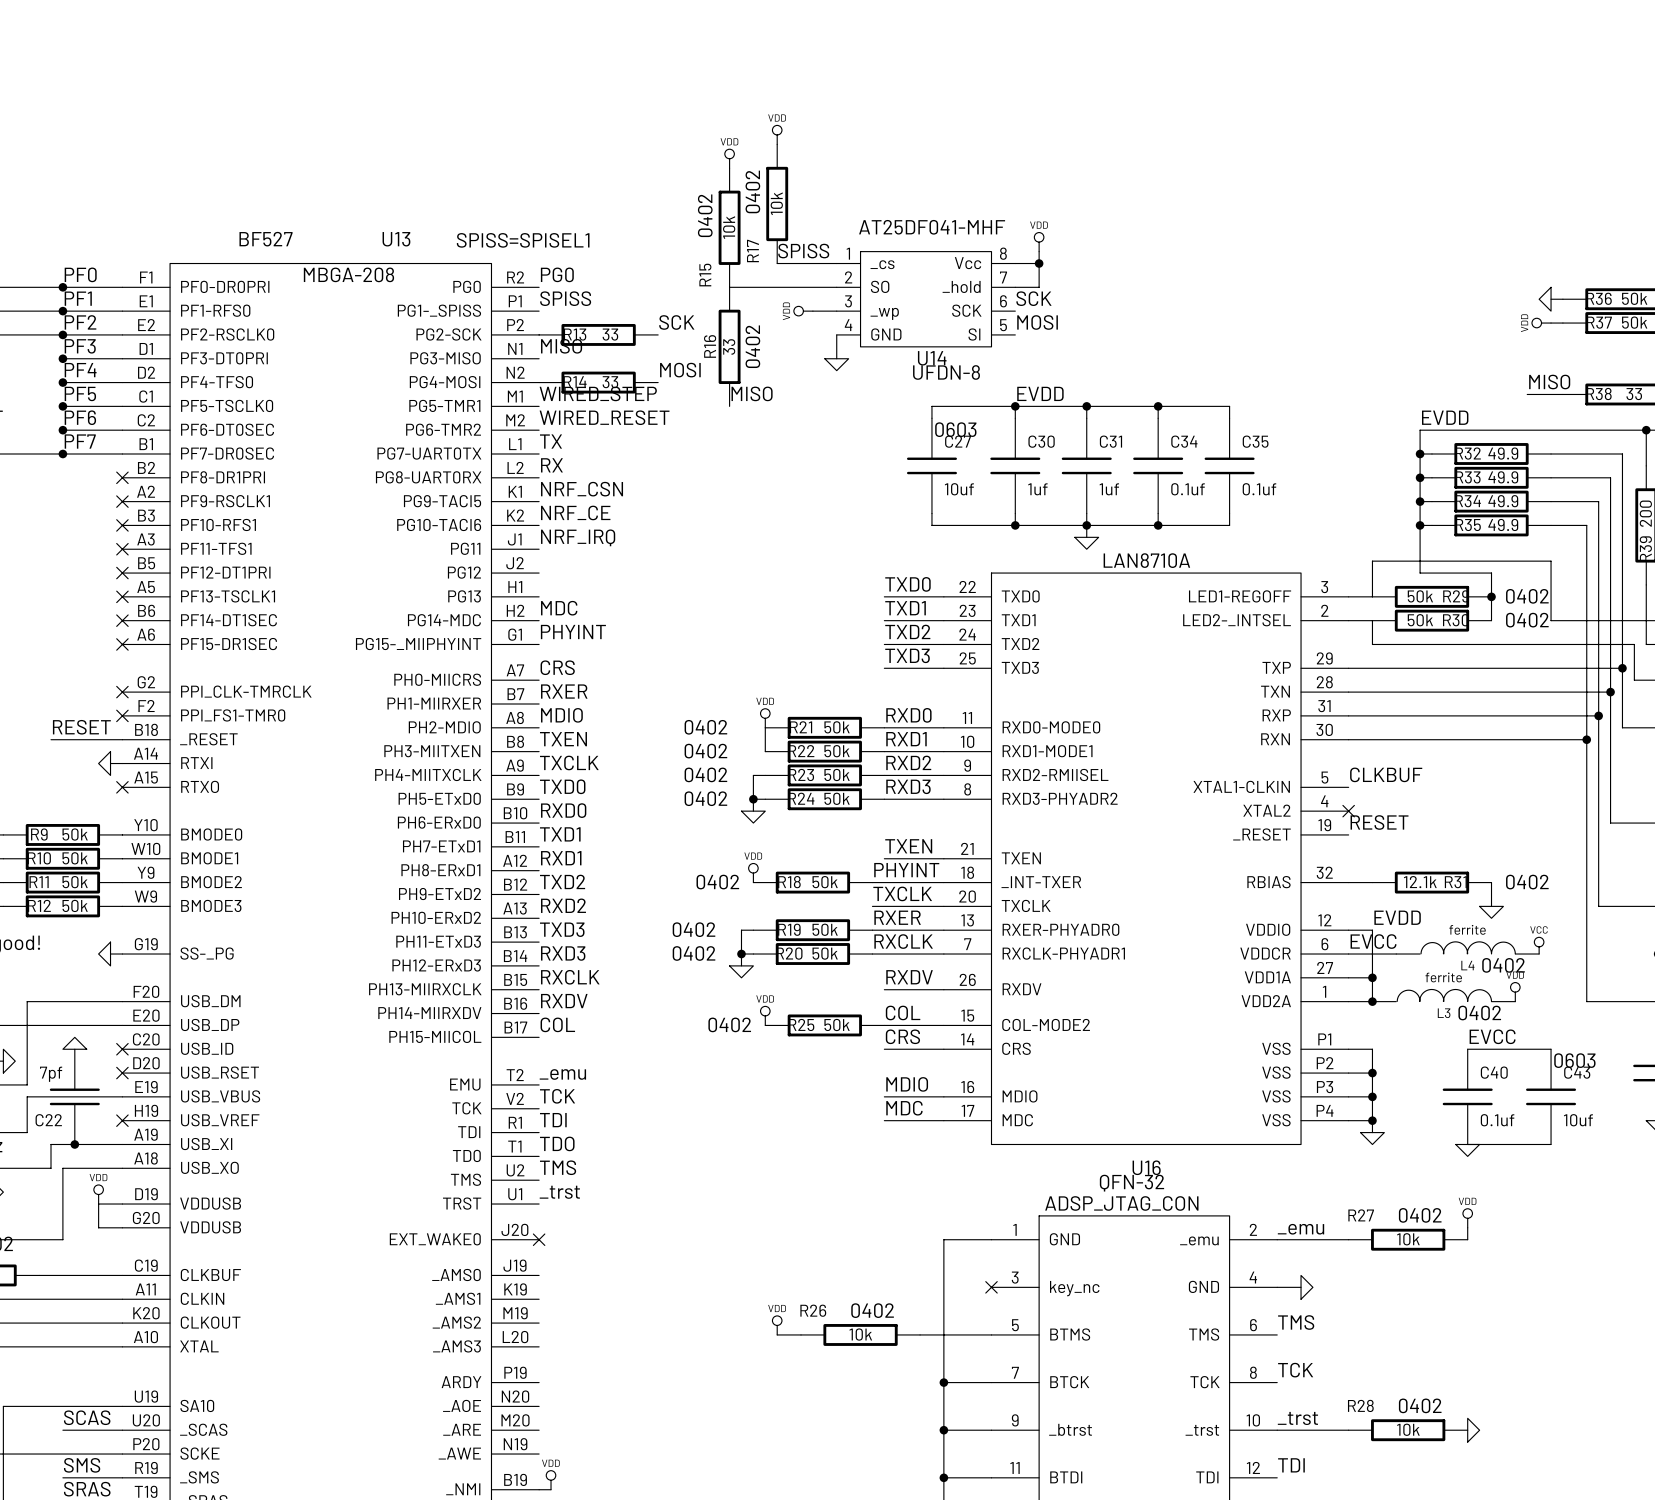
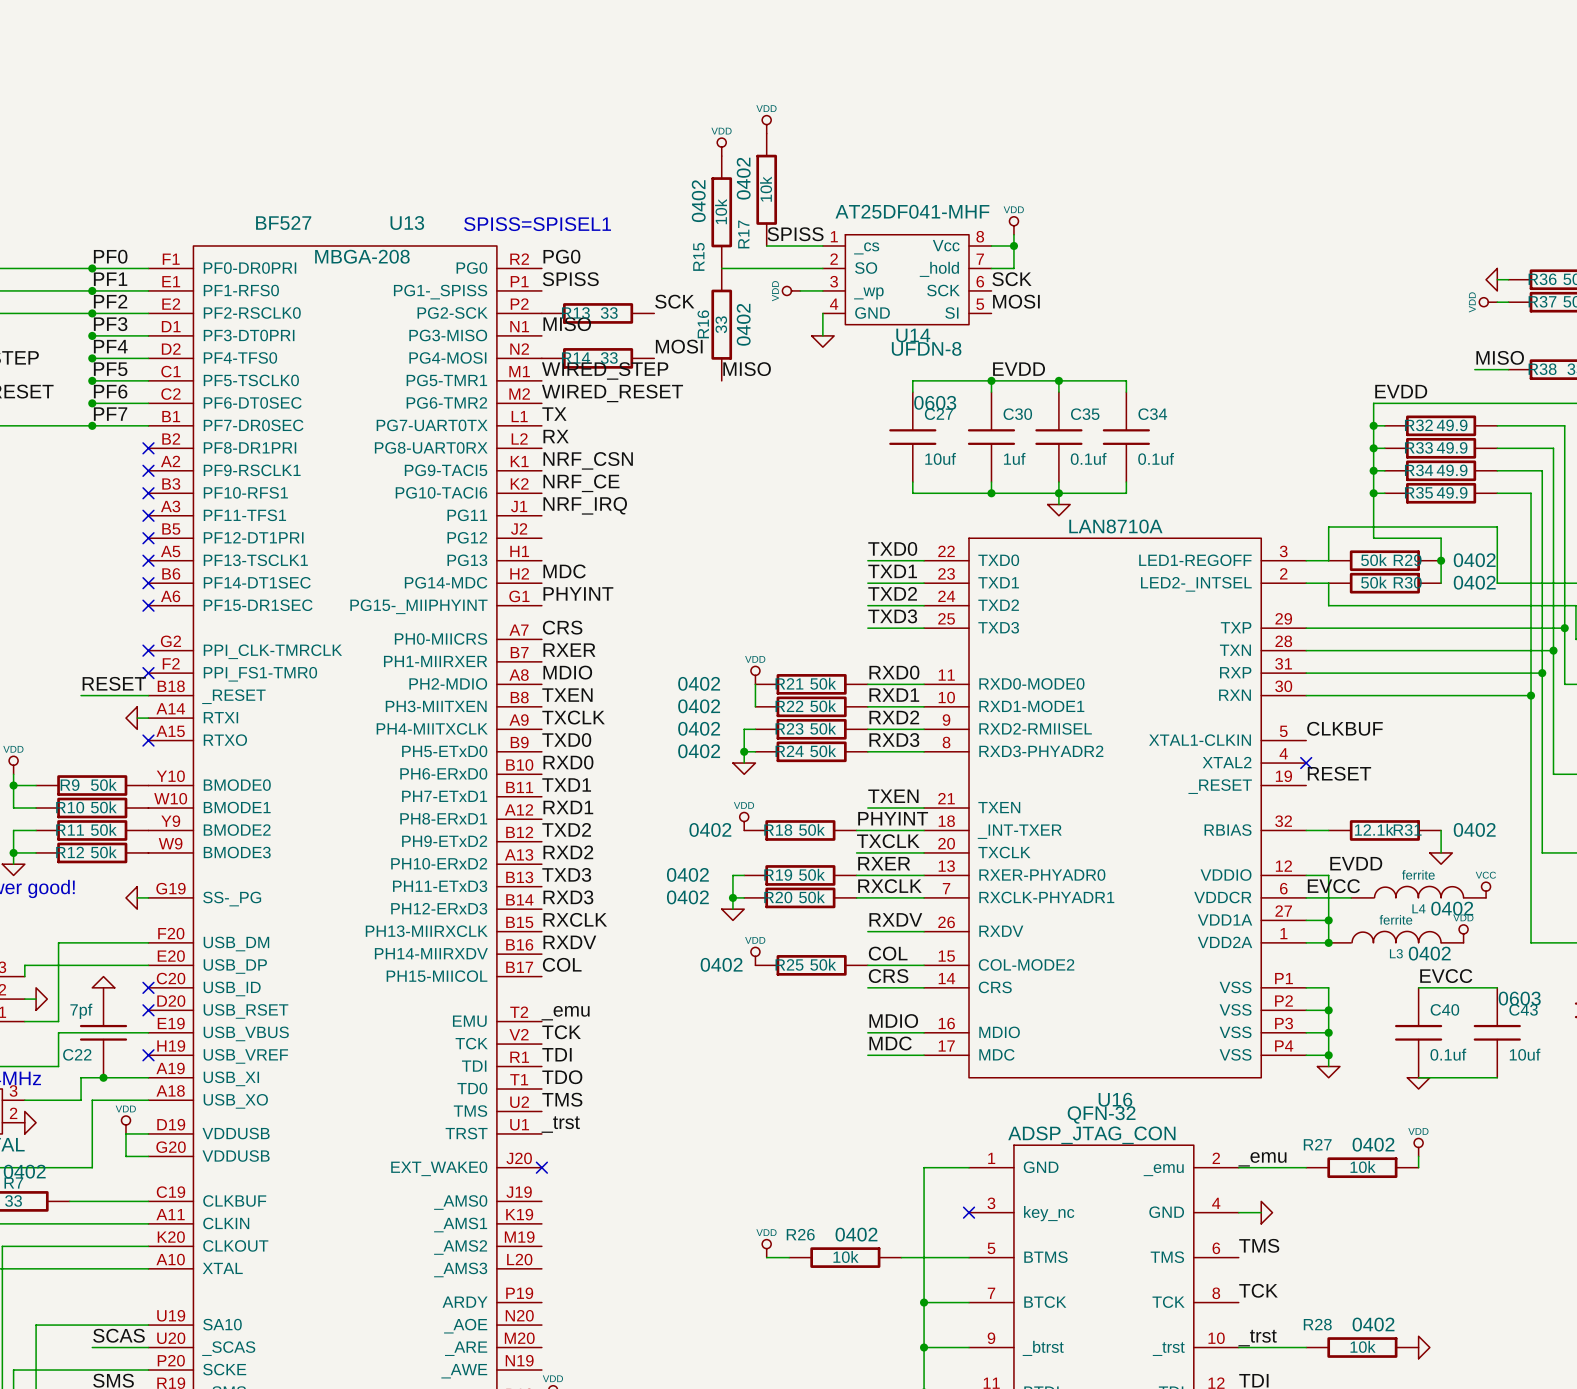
wire: (1158, 406) (1229, 406) (1229, 418) -> none
junction: (1158, 406) -> none
C31 name: C31 (1110, 441) -> C35 (1085, 414)
C35: 0.1uf (1229, 465) -> none
C31 value: 1uf (1109, 489) -> 0.1uf (1088, 458)
wire: (1229, 513) (1229, 525) (1158, 525) -> none
junction: (1158, 525) -> none

